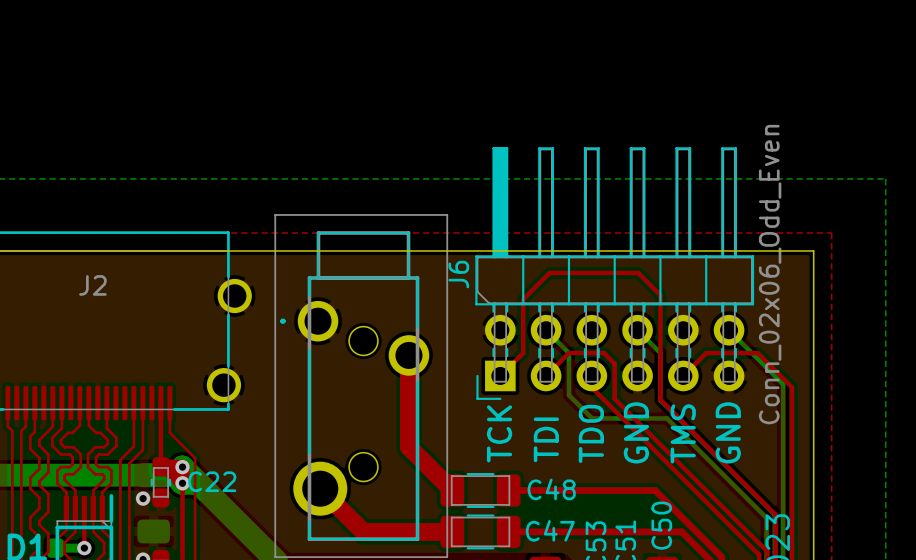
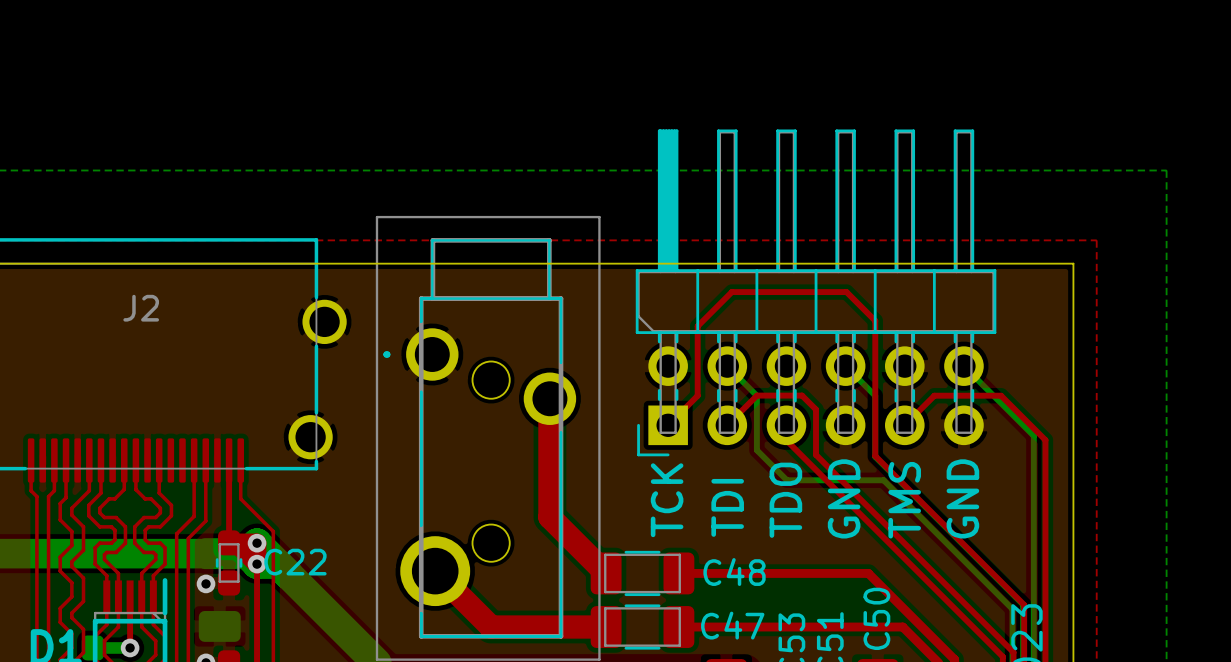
J6 name: J6 (458, 274) -> none
J6 value: Conn_02x06_Odd_Even (770, 274) -> none

